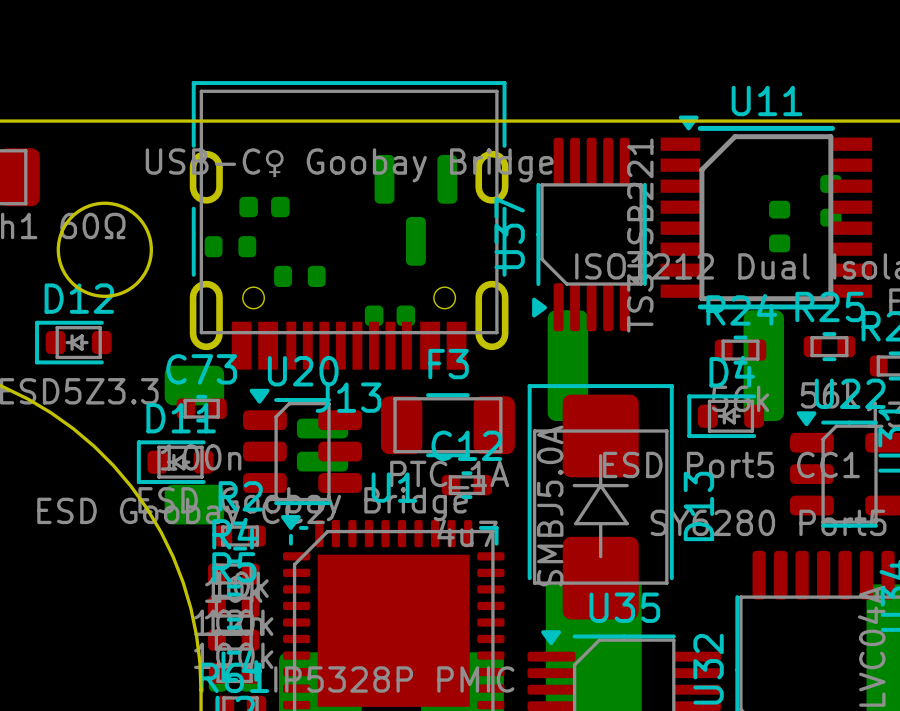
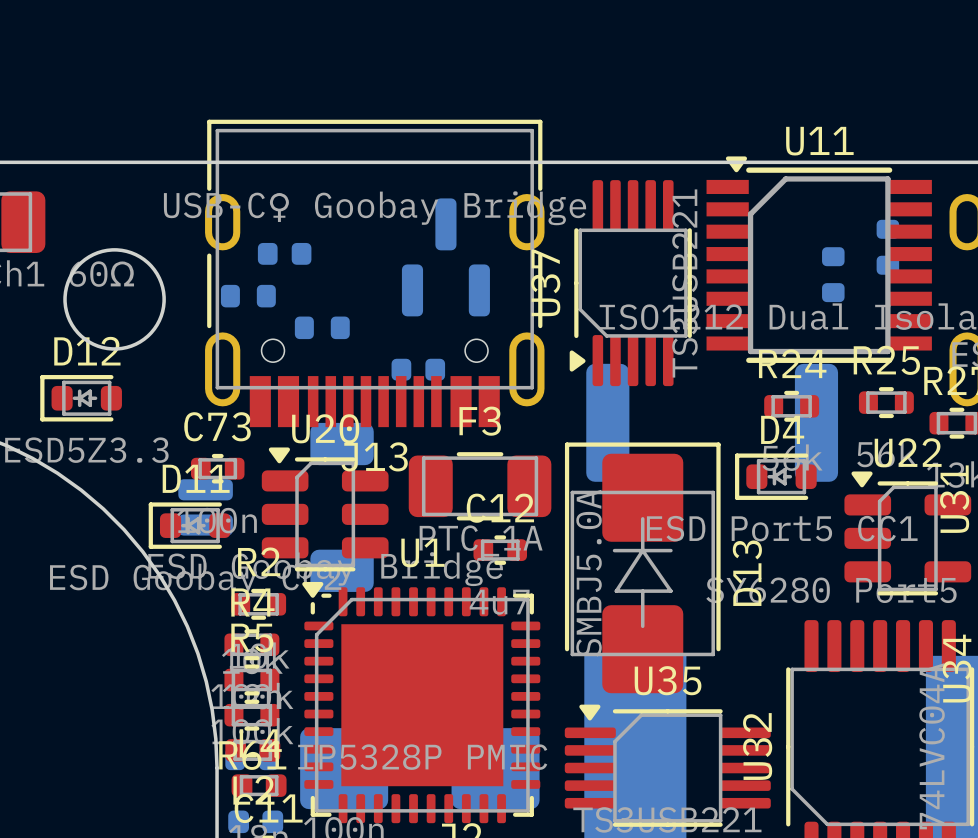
part rotation: 0° (415, 210) -> 180° (445, 257)
part rotation: 0° (256, 445) -> 180° (276, 507)

